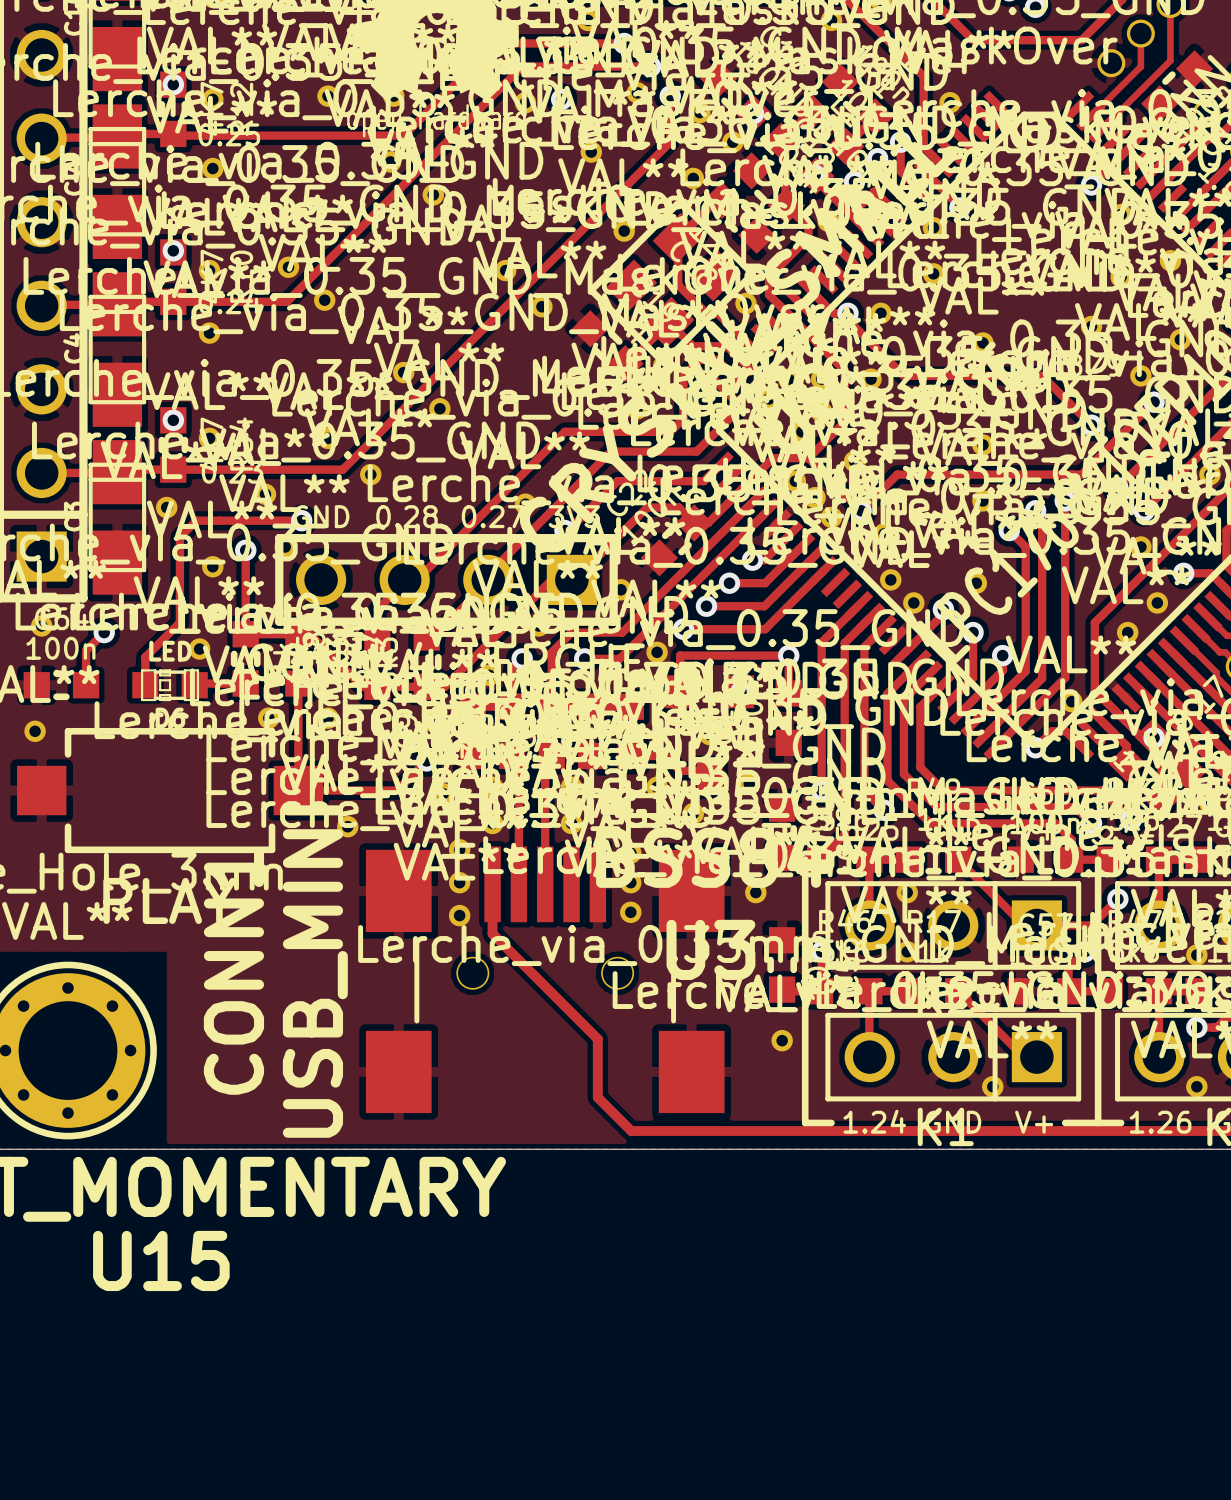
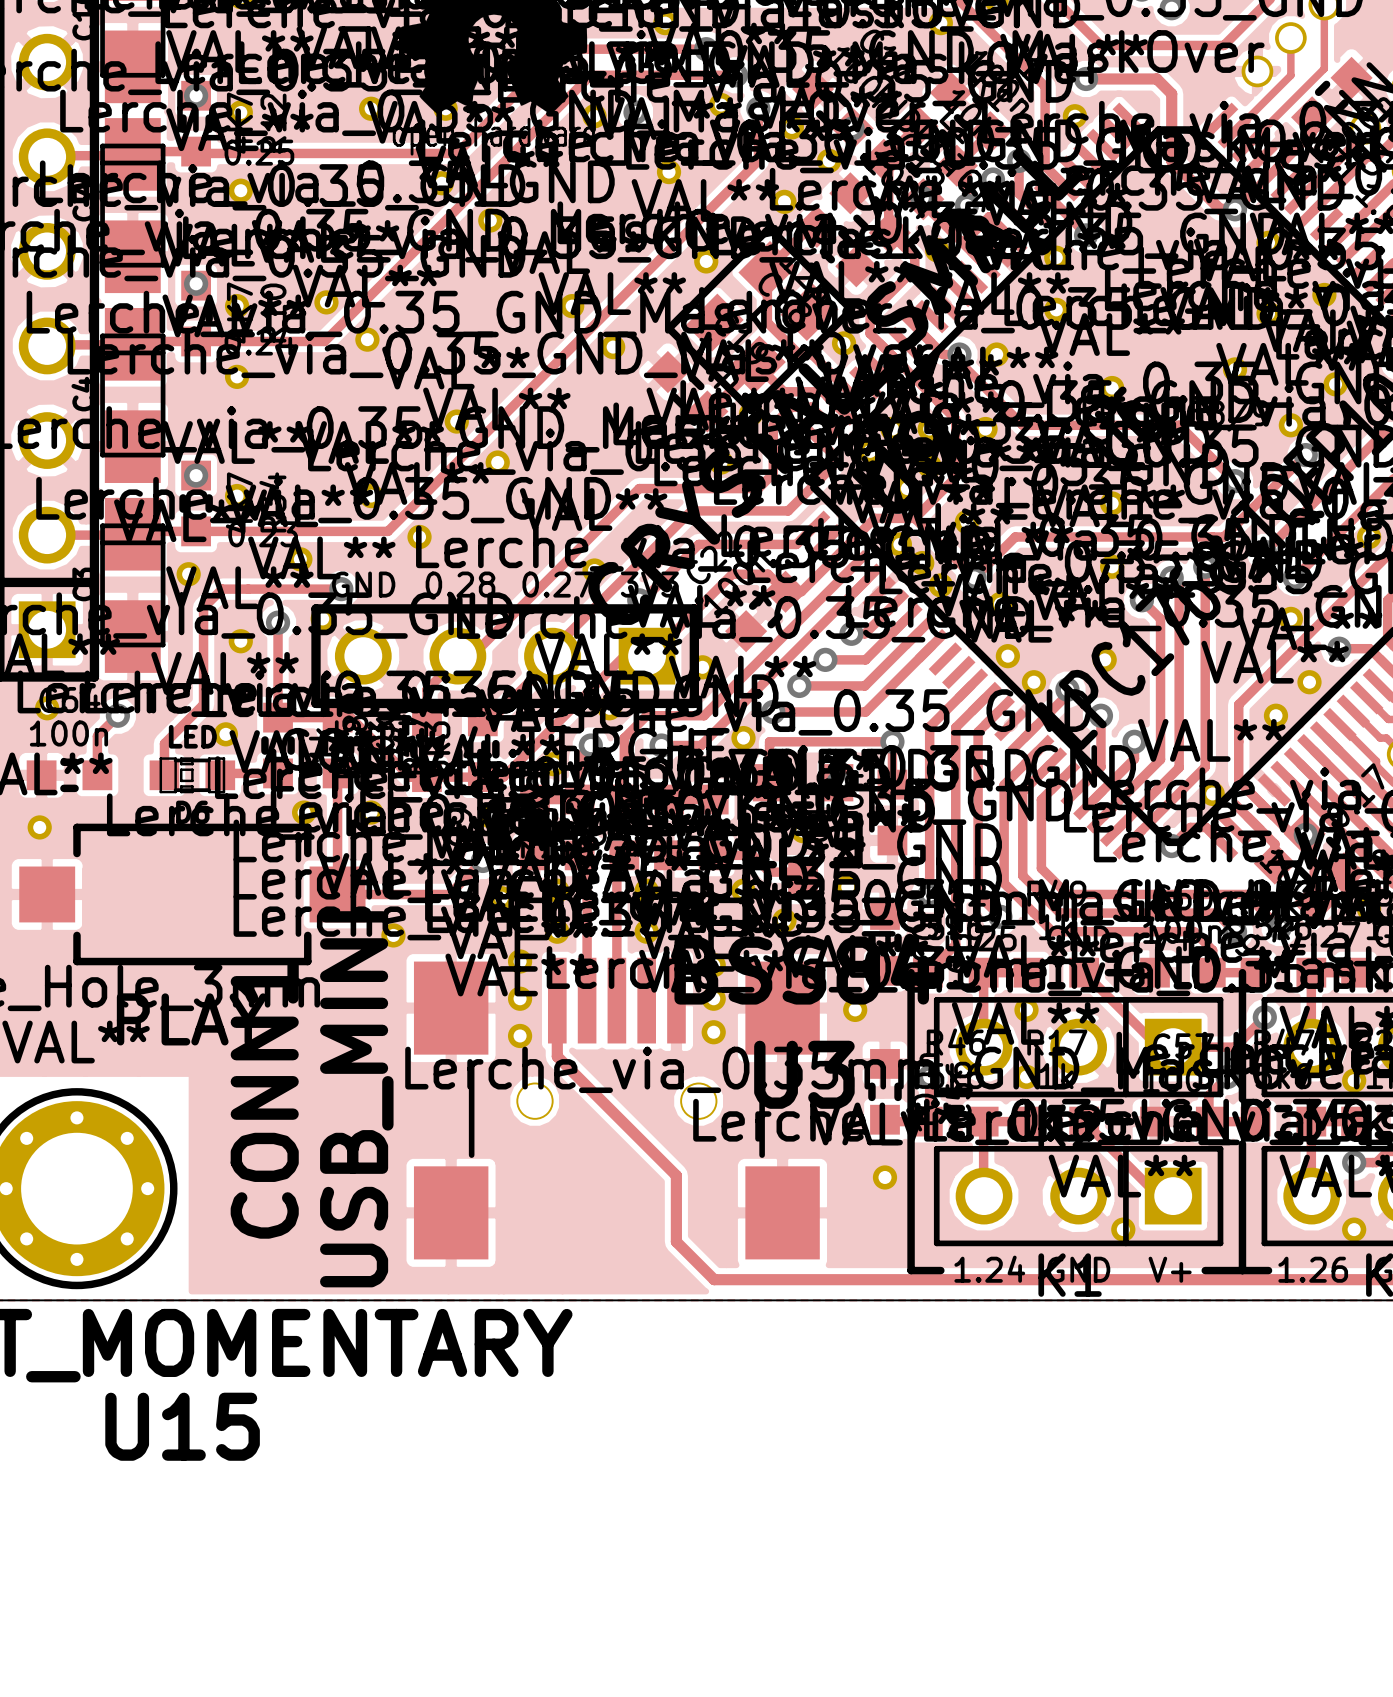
track: none -> (1086, 78) (1156, 78) (1171, 93) (1171, 160) (1220, 209) (1235, 209)
via: none -> (1086, 78)

